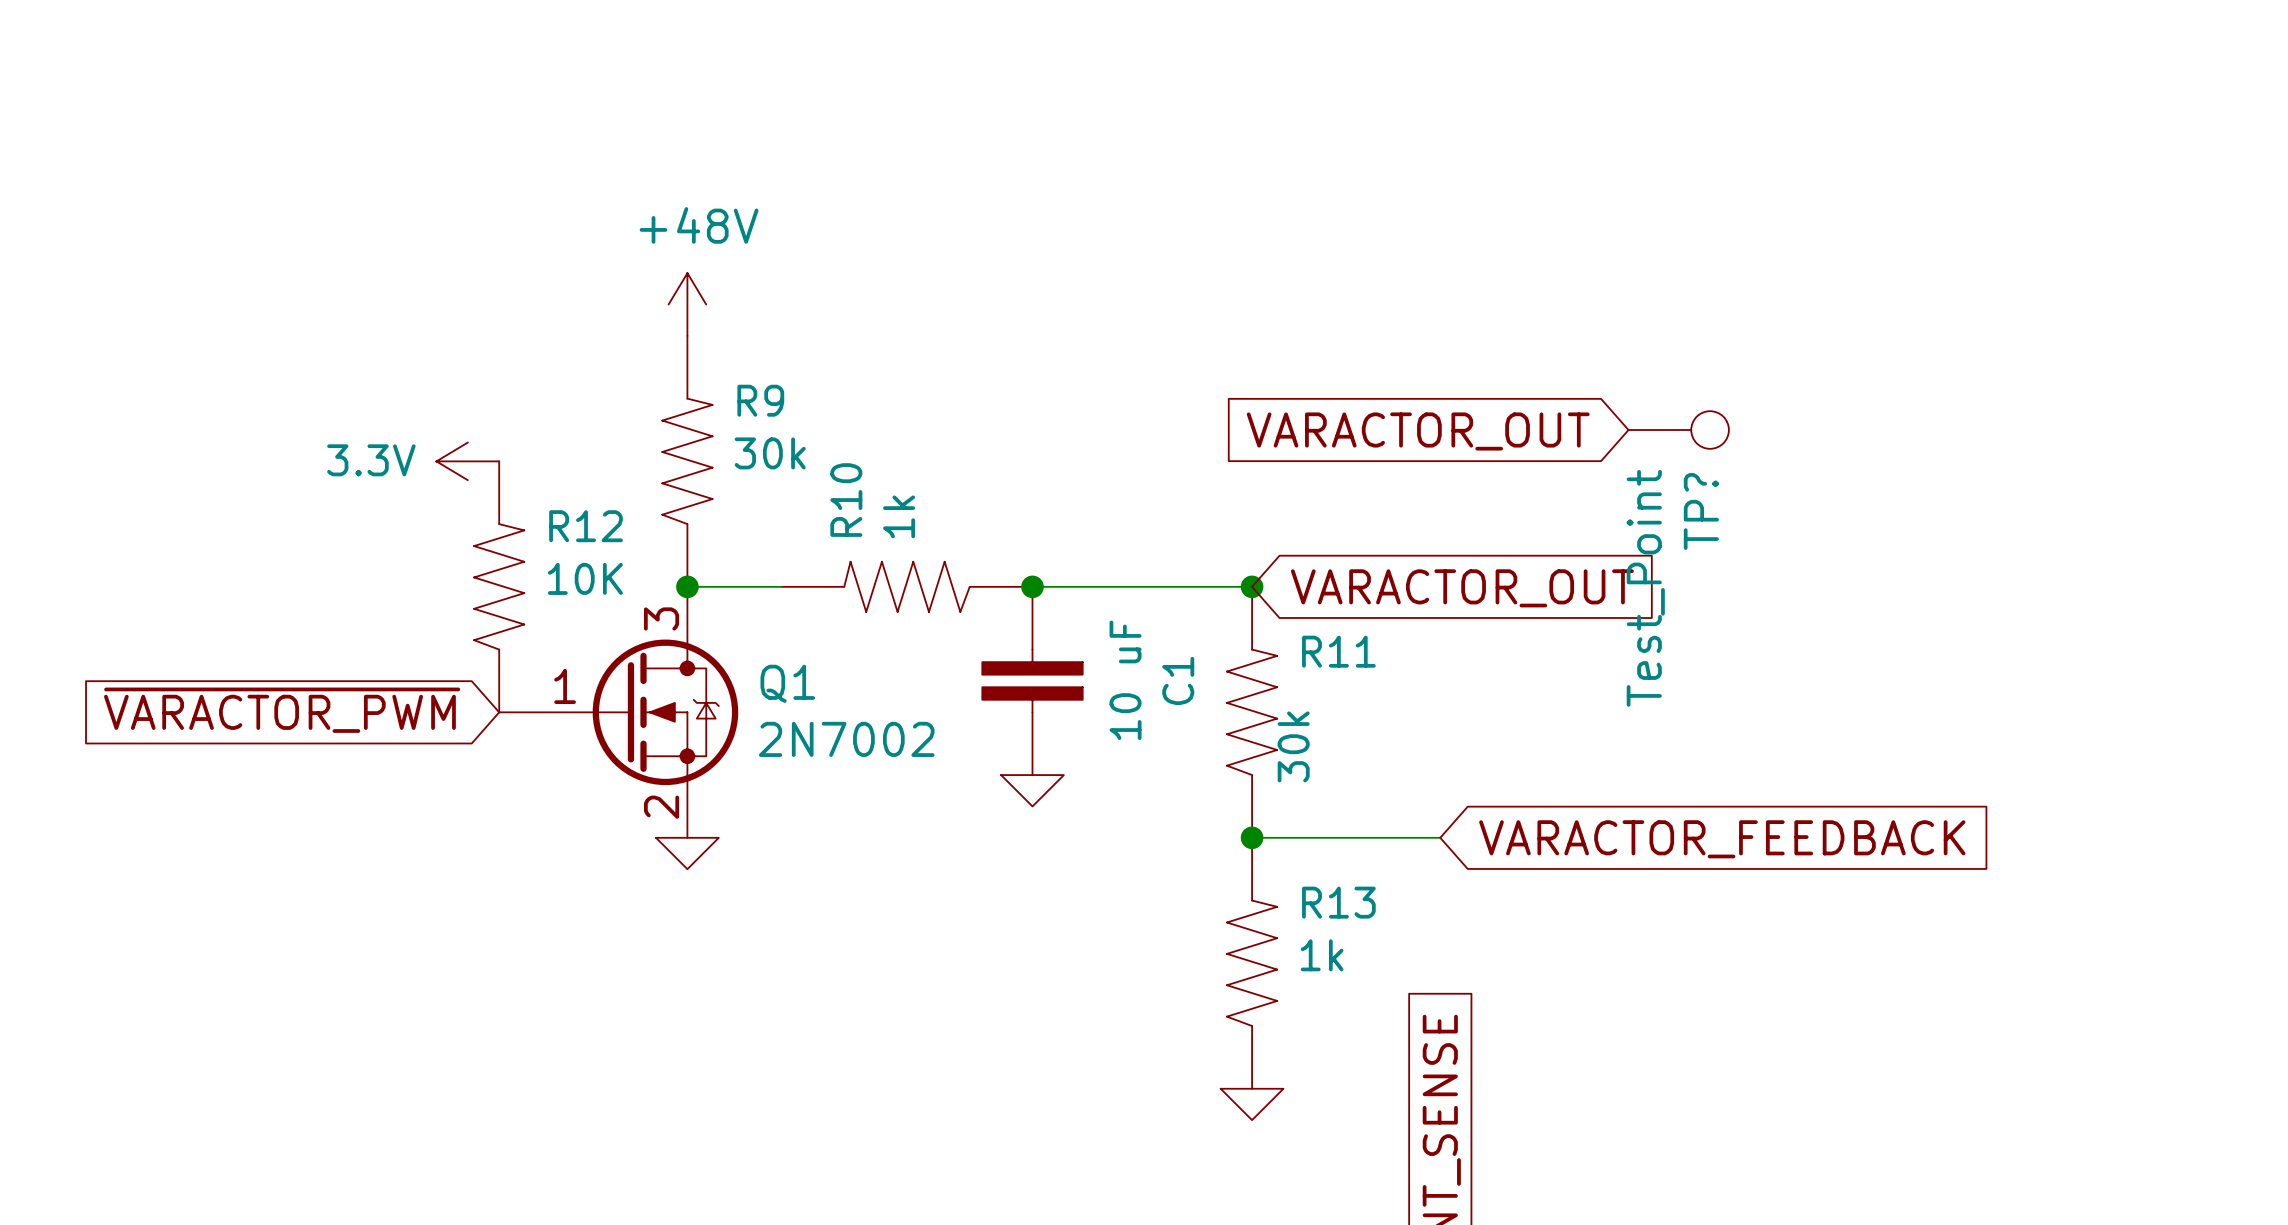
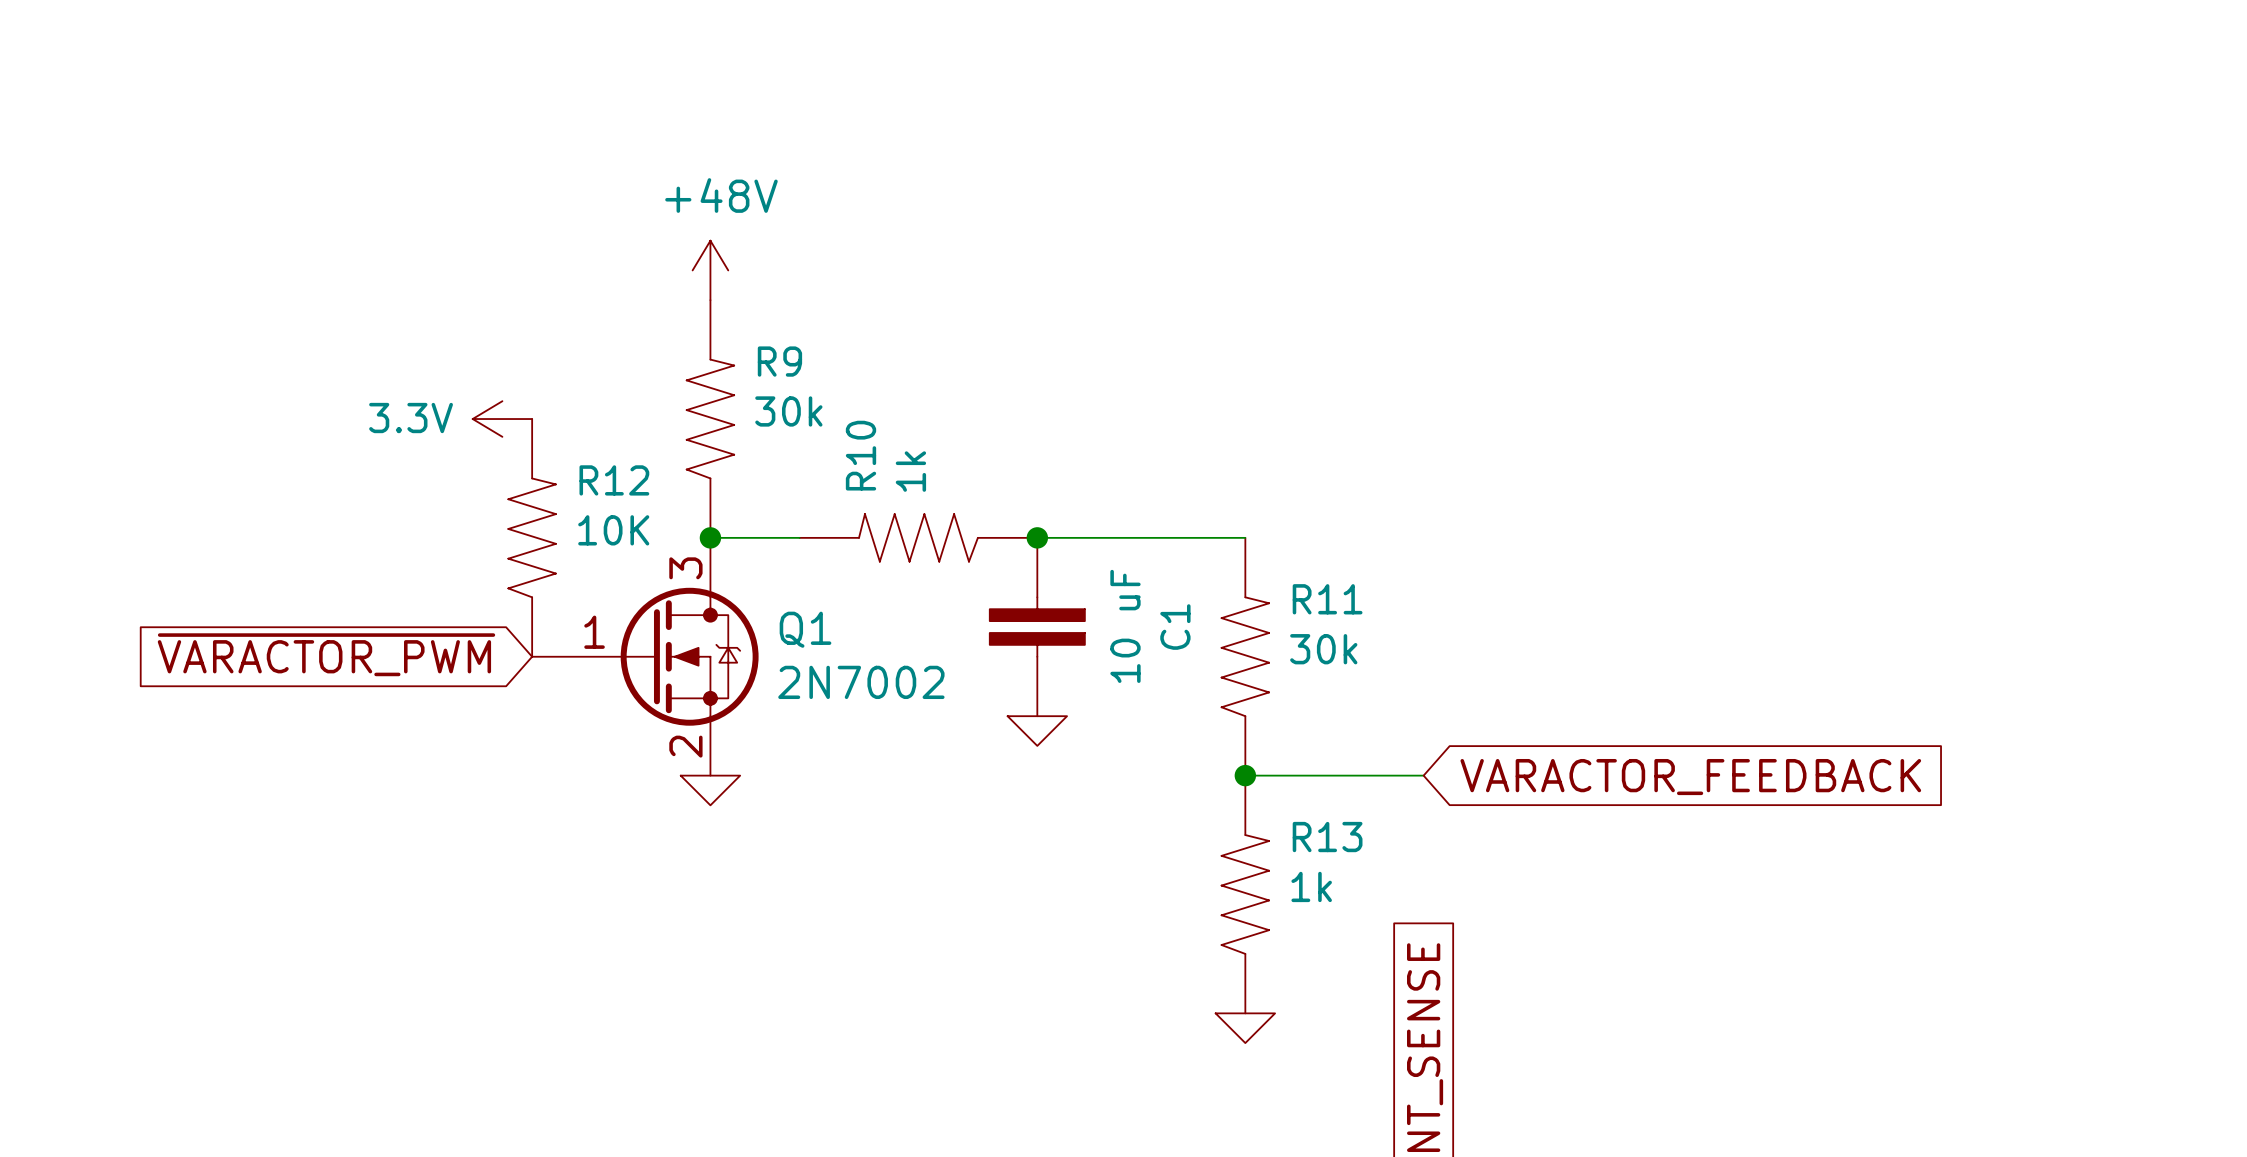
TP?: Test_Point (1678, 430) -> none
global label: VARACTOR_OUT (1418, 431) -> none
junction: (1252, 586) -> none
global label: VARACTOR_OUT (1462, 588) -> none
R11 value rotation: 0° (1293, 746) -> 90° clockwise (1323, 649)

